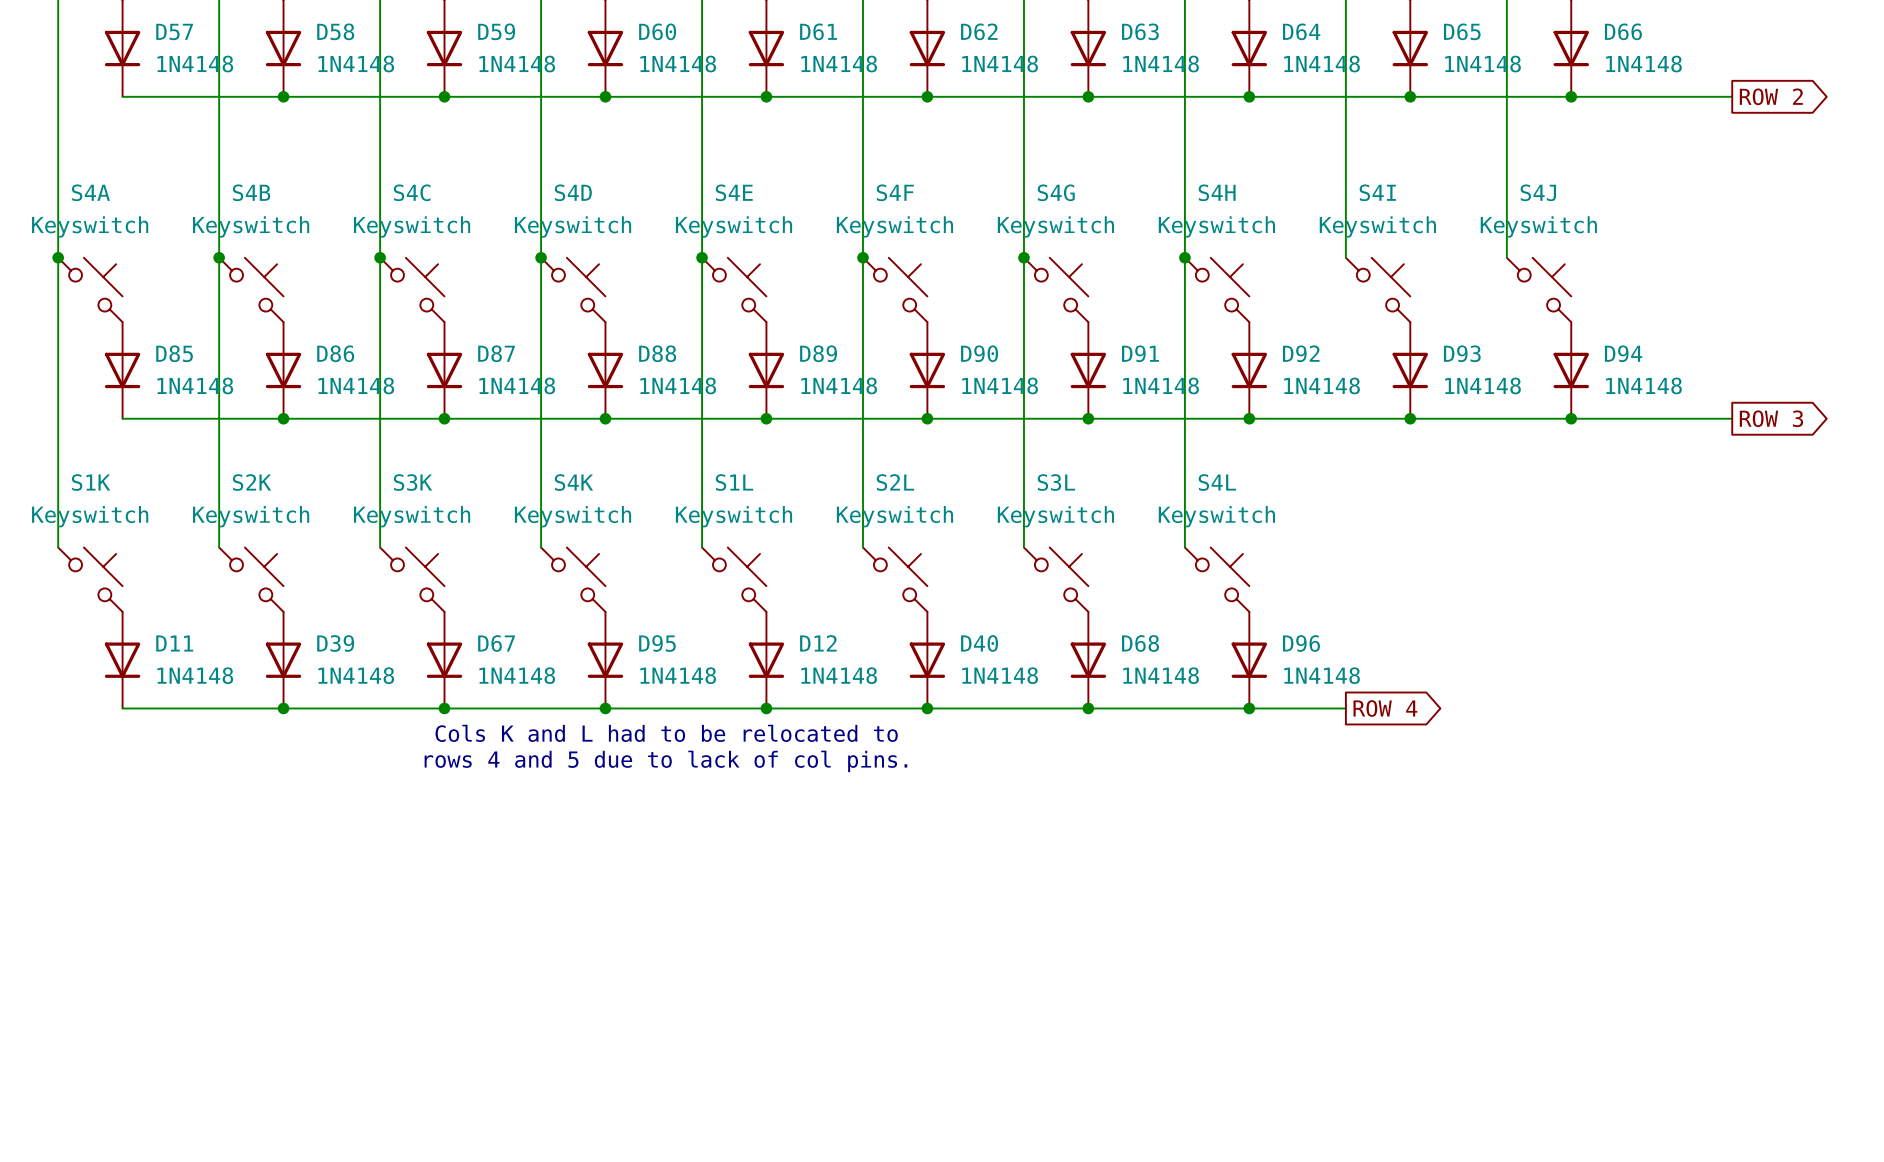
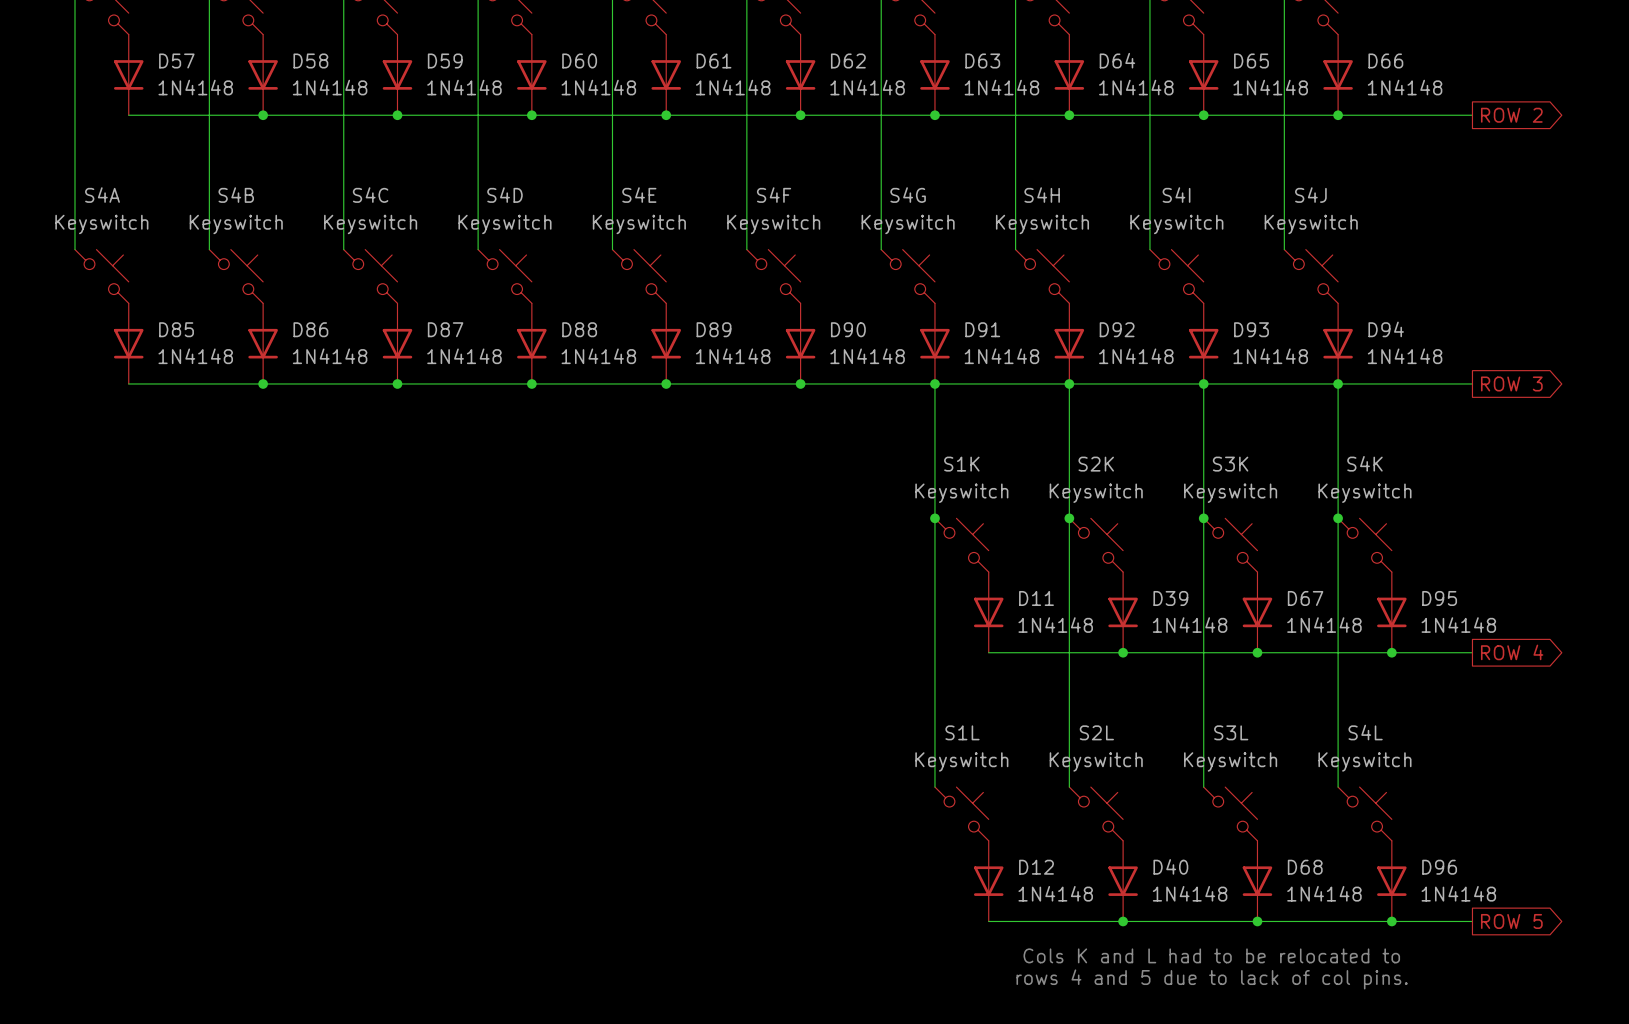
wire: (58, 257) (58, 547) -> none
junction: (58, 257) -> none
wire: (219, 257) (219, 547) -> none
junction: (219, 257) -> none
wire: (380, 257) (380, 547) -> none
junction: (380, 257) -> none
wire: (541, 257) (541, 547) -> none
junction: (541, 257) -> none
wire: (702, 257) (702, 547) -> none
junction: (702, 257) -> none
wire: (863, 257) (863, 547) -> none
junction: (863, 257) -> none
wire: (1023, 257) (1023, 547) -> none
junction: (1023, 257) -> none
wire: (1184, 257) (1184, 547) -> none
junction: (1184, 257) -> none
wire: none -> (934, 383) (934, 787)
wire: none -> (1069, 383) (1069, 787)
wire: none -> (1203, 383) (1203, 787)
wire: none -> (1338, 383) (1338, 787)
S1K position: (90, 579) -> (961, 545)
S2K position: (251, 579) -> (1096, 545)
S3K position: (412, 579) -> (1230, 545)
S4K position: (573, 579) -> (1364, 545)
S1L position: (734, 579) -> (961, 813)
S2L position: (895, 579) -> (1096, 813)
S3L position: (1056, 579) -> (1230, 813)
junction: none -> (934, 518)
S4L position: (1217, 579) -> (1364, 813)
junction: none -> (1069, 518)
junction: none -> (1203, 518)
junction: none -> (1338, 518)
D11 position: (122, 660) -> (988, 612)
D39 position: (283, 660) -> (1123, 612)
D67 position: (444, 660) -> (1257, 612)
D95 position: (605, 660) -> (1391, 612)
D12 position: (766, 660) -> (988, 881)
D40 position: (927, 660) -> (1123, 881)
D68 position: (1088, 660) -> (1257, 881)
D96 position: (1249, 660) -> (1391, 881)
wire: (122, 708) (1345, 708) -> none
junction: (283, 708) -> none
junction: (444, 708) -> none
junction: (605, 708) -> none
junction: (766, 708) -> none
junction: (927, 708) -> none
junction: (1088, 708) -> none
junction: (1249, 708) -> none
global label: ROW 4 (1385, 708) -> none
text: Cols K and L had to be relocated to (666, 733) -> none
wire: none -> (988, 652) (1472, 652)
junction: none -> (1123, 652)
junction: none -> (1257, 652)
junction: none -> (1391, 652)
global label: none -> ROW 4 (1512, 652)
text: rows 4 and 5 due to lack of col pins. (665, 761) -> none
wire: none -> (988, 921) (1472, 921)
junction: none -> (1123, 921)
junction: none -> (1257, 921)
junction: none -> (1391, 921)
global label: none -> ROW 5 (1511, 921)
text: none -> Cols K and L had to be relocated to (1211, 955)
text: none -> rows 4 and 5 due to lack of col pins. (1212, 979)

